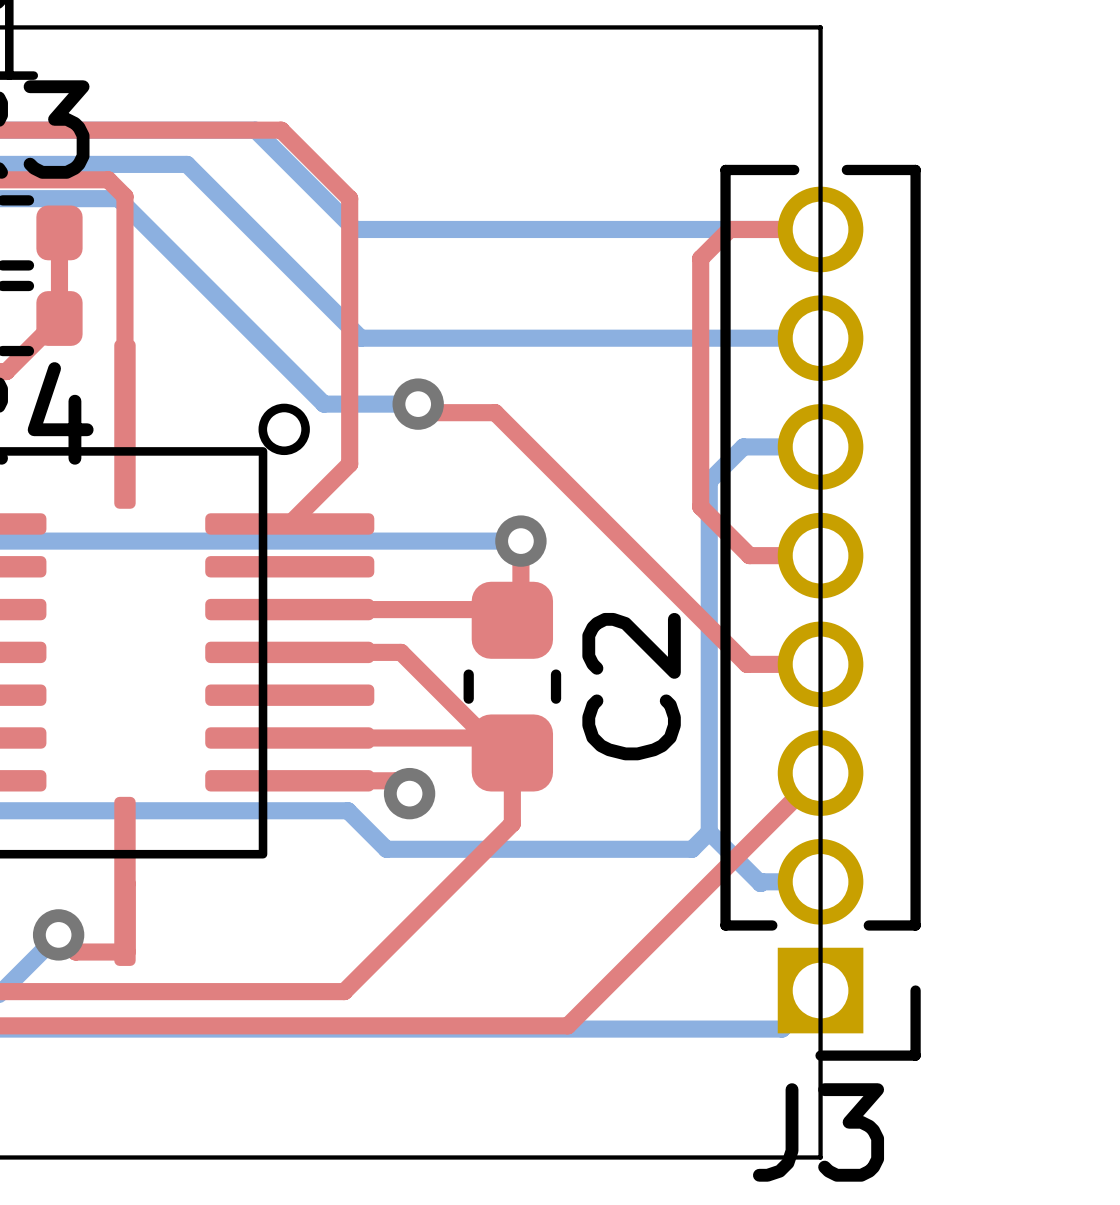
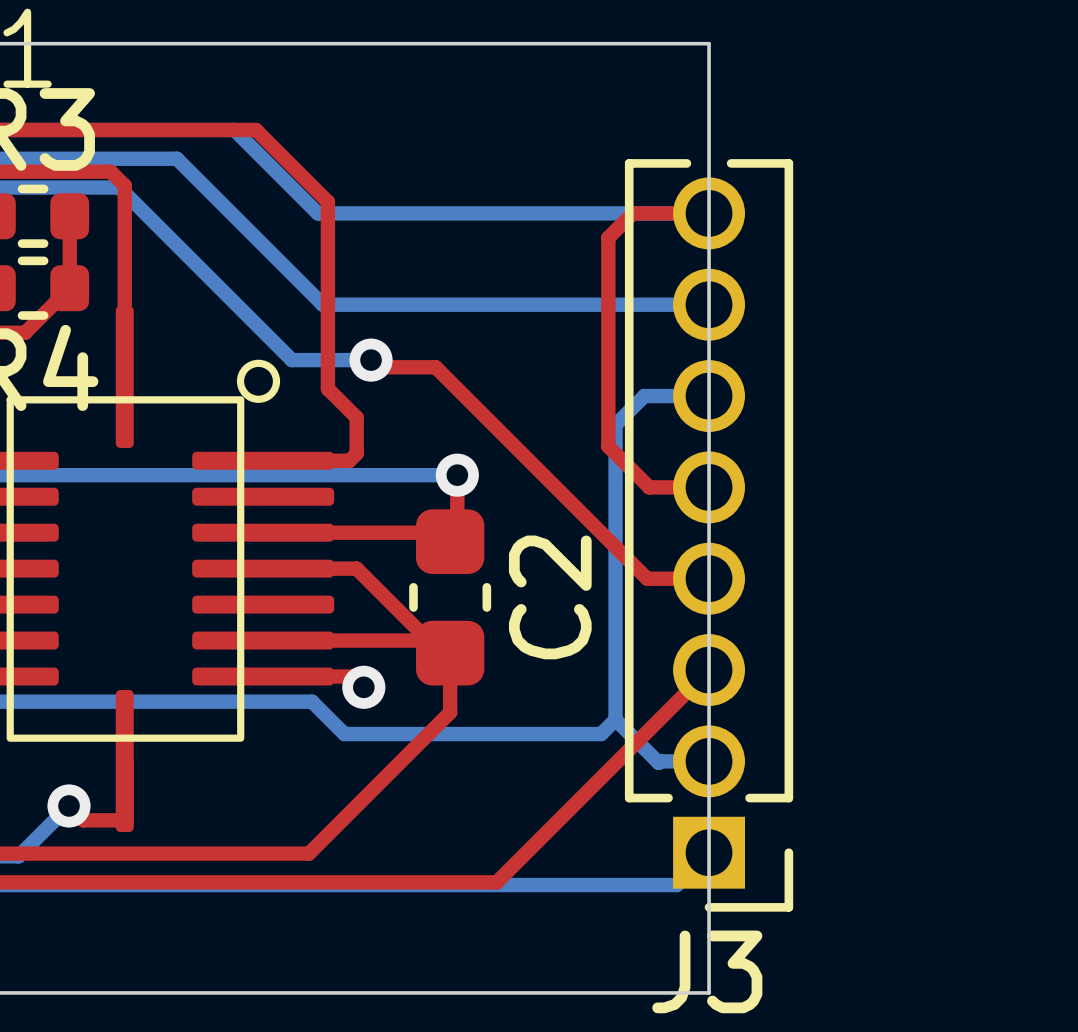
top track: (349, 198) (349, 464) (289, 523) -> (313, 187) (327, 201) (327, 388) (356, 417) (356, 453) (349, 460) (263, 460)

